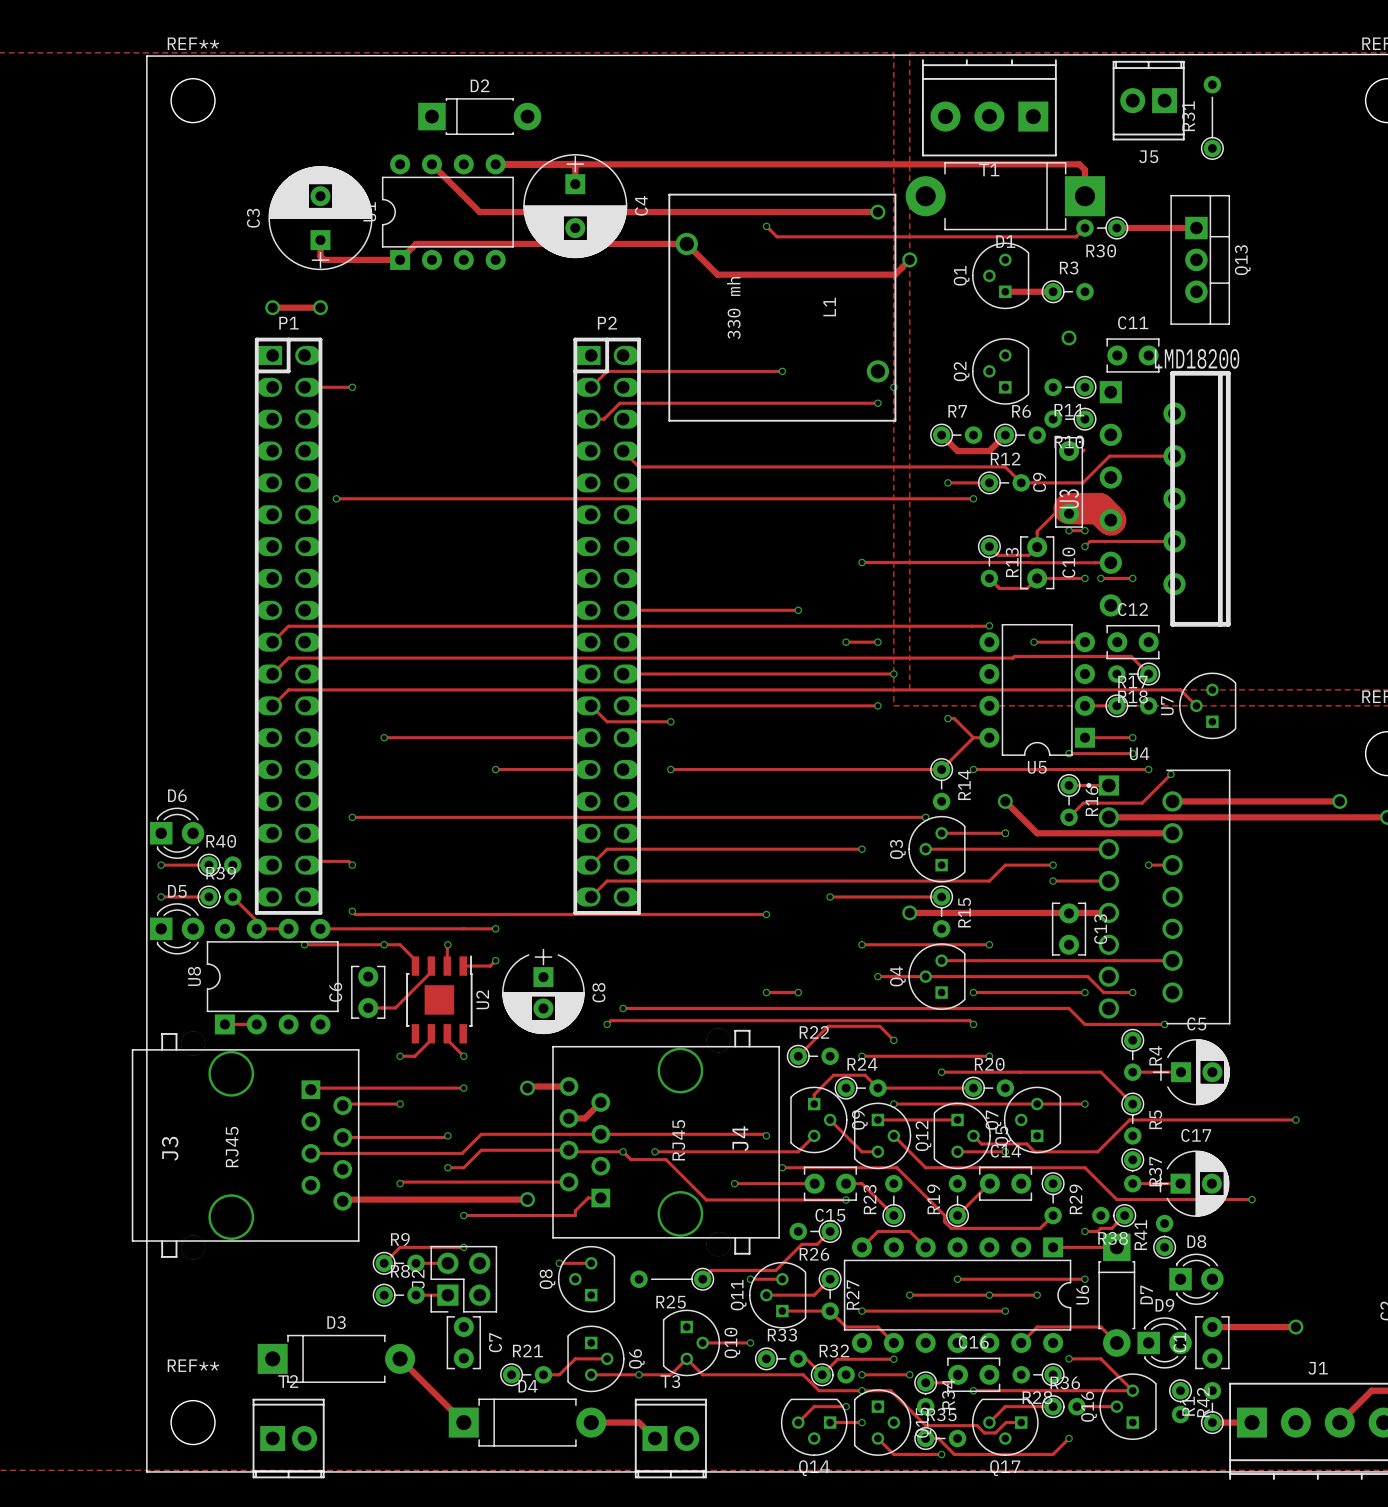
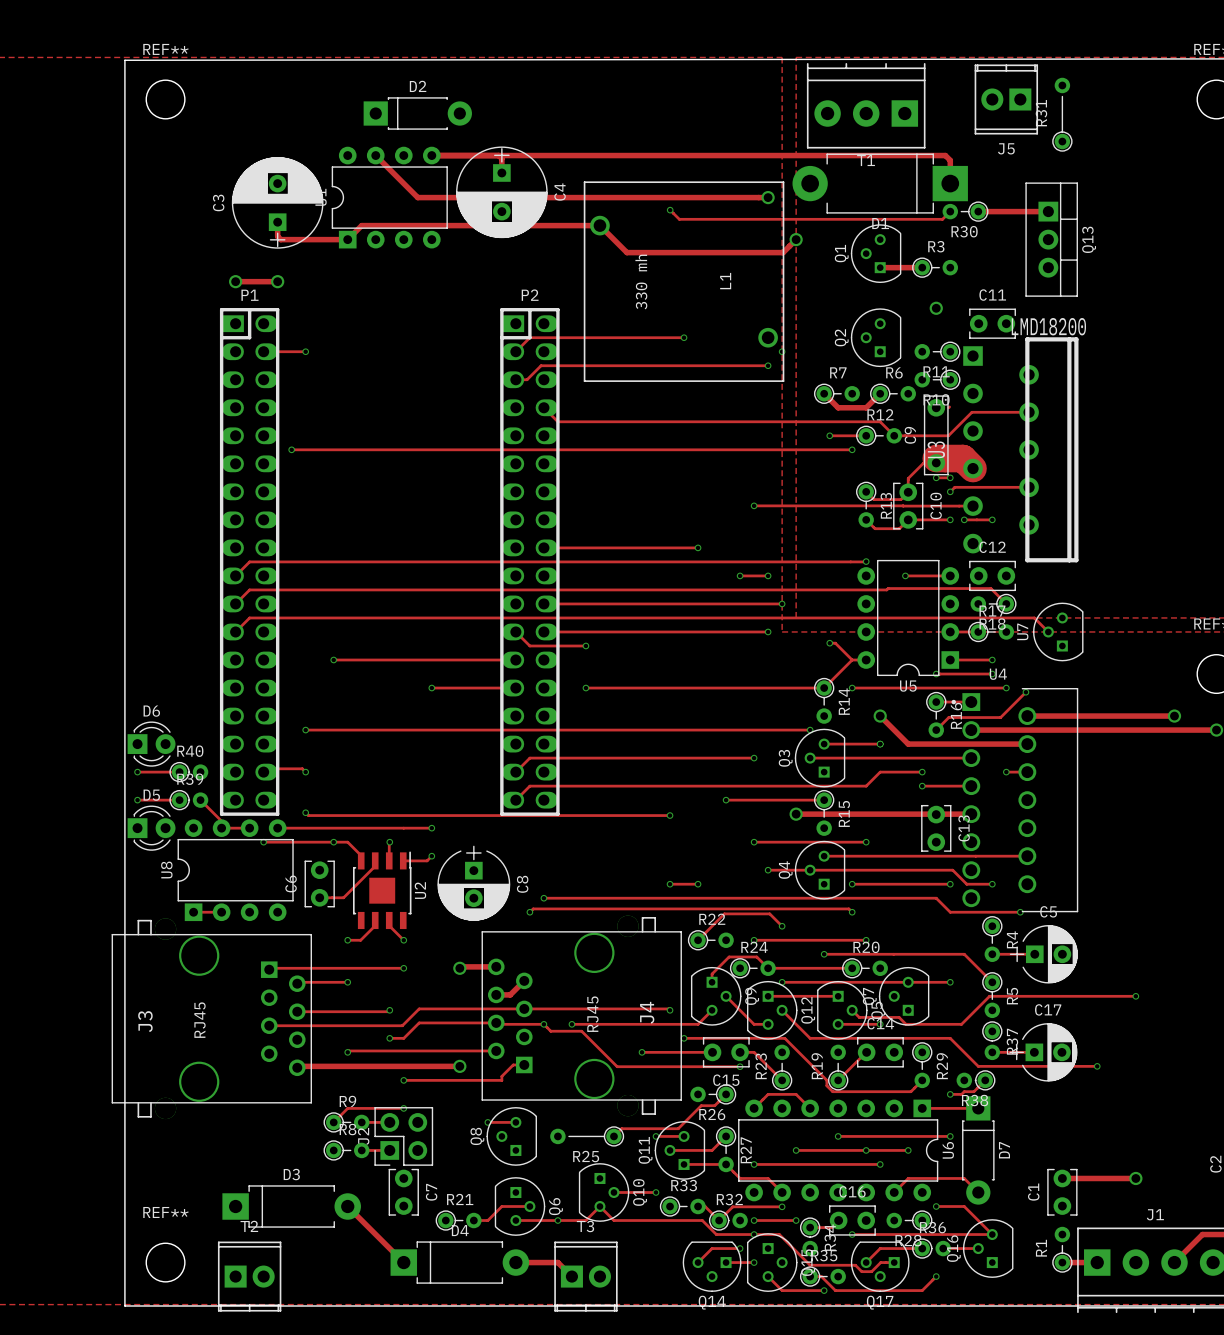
R41: (1164, 1236) -> none
D8: (1196, 1279) -> none
D9: (1164, 1342) -> none
R42: (1180, 1401) -> none

